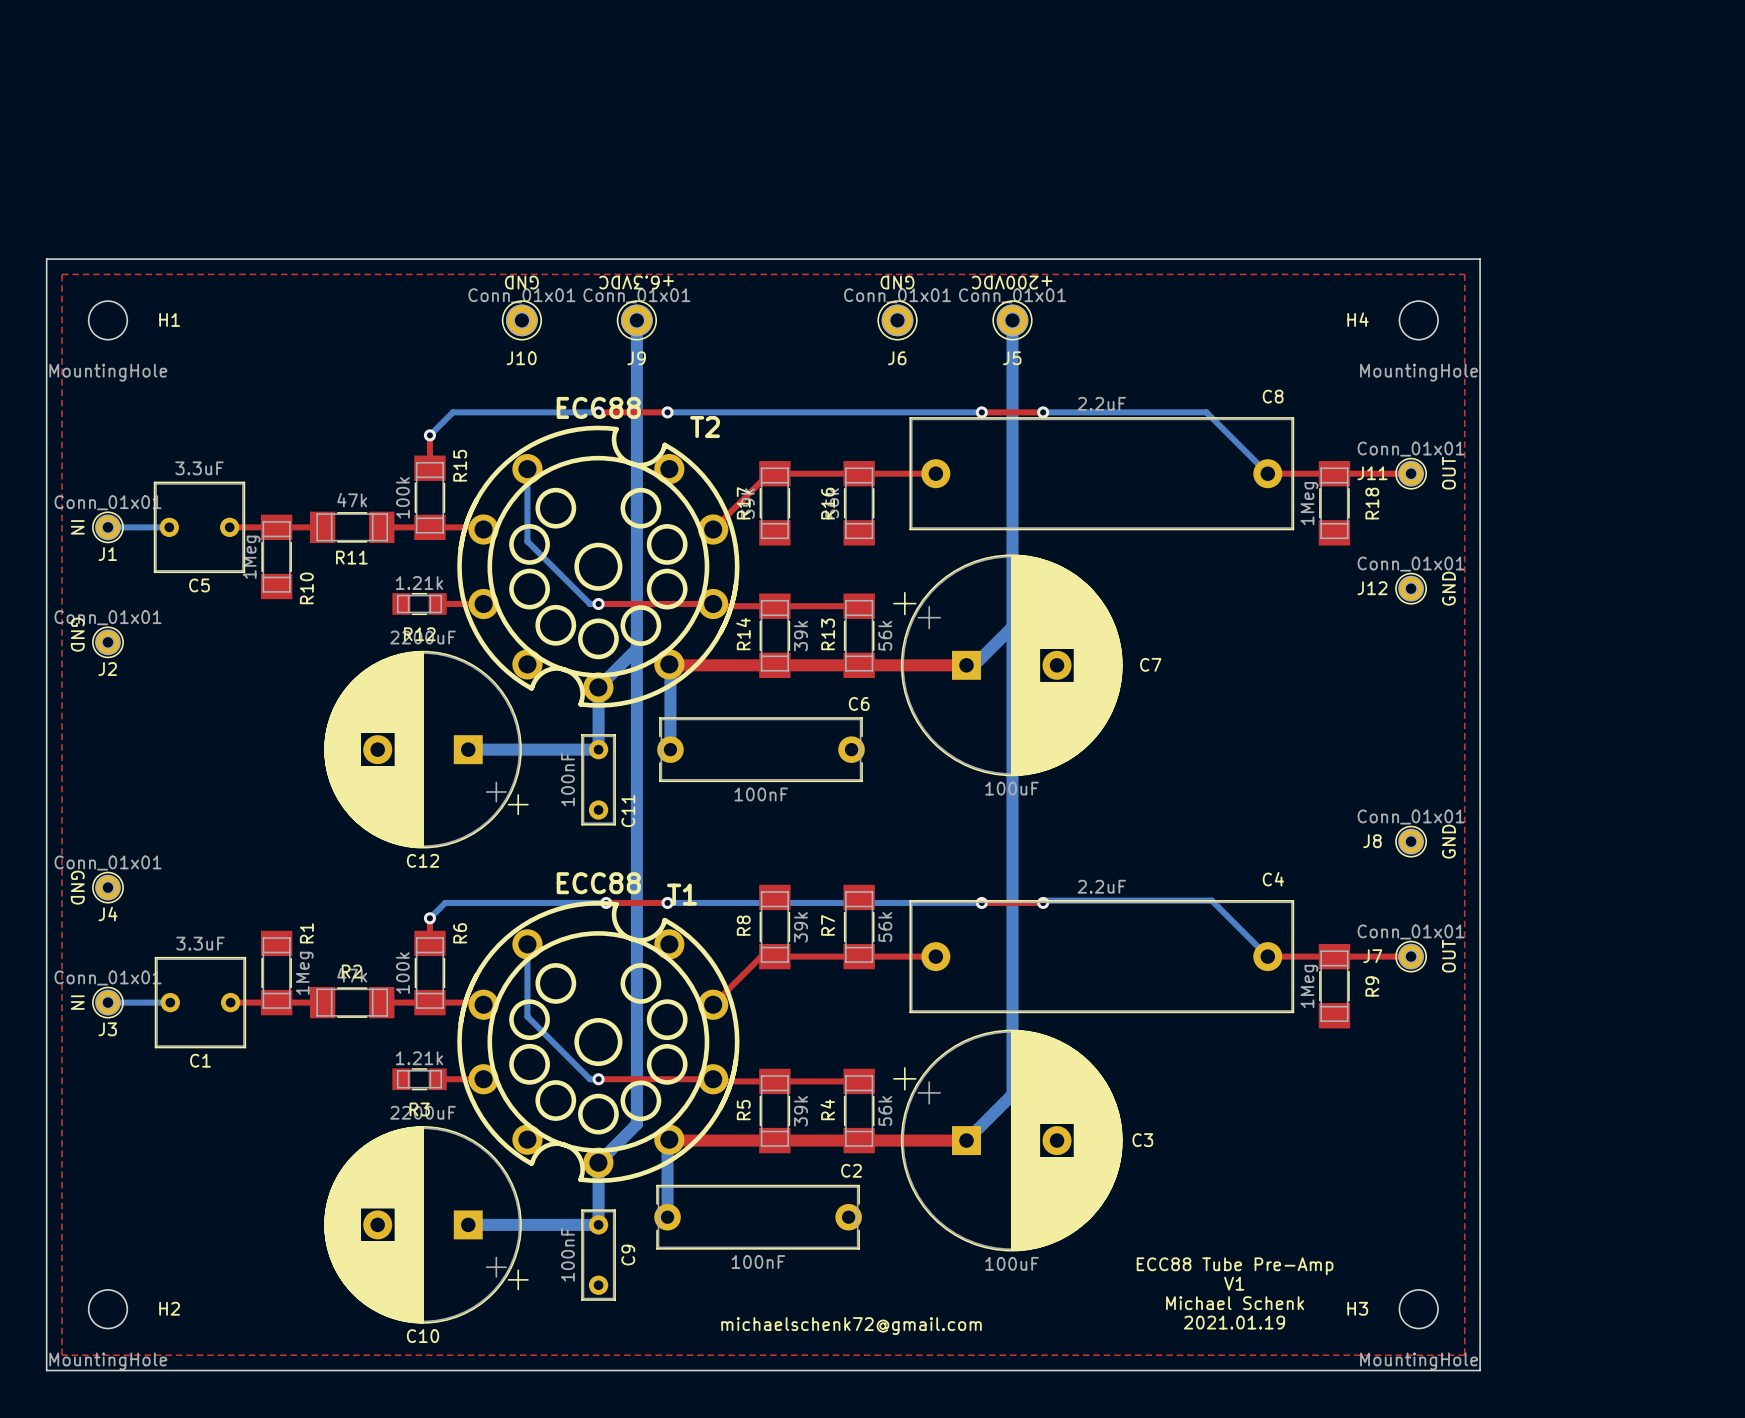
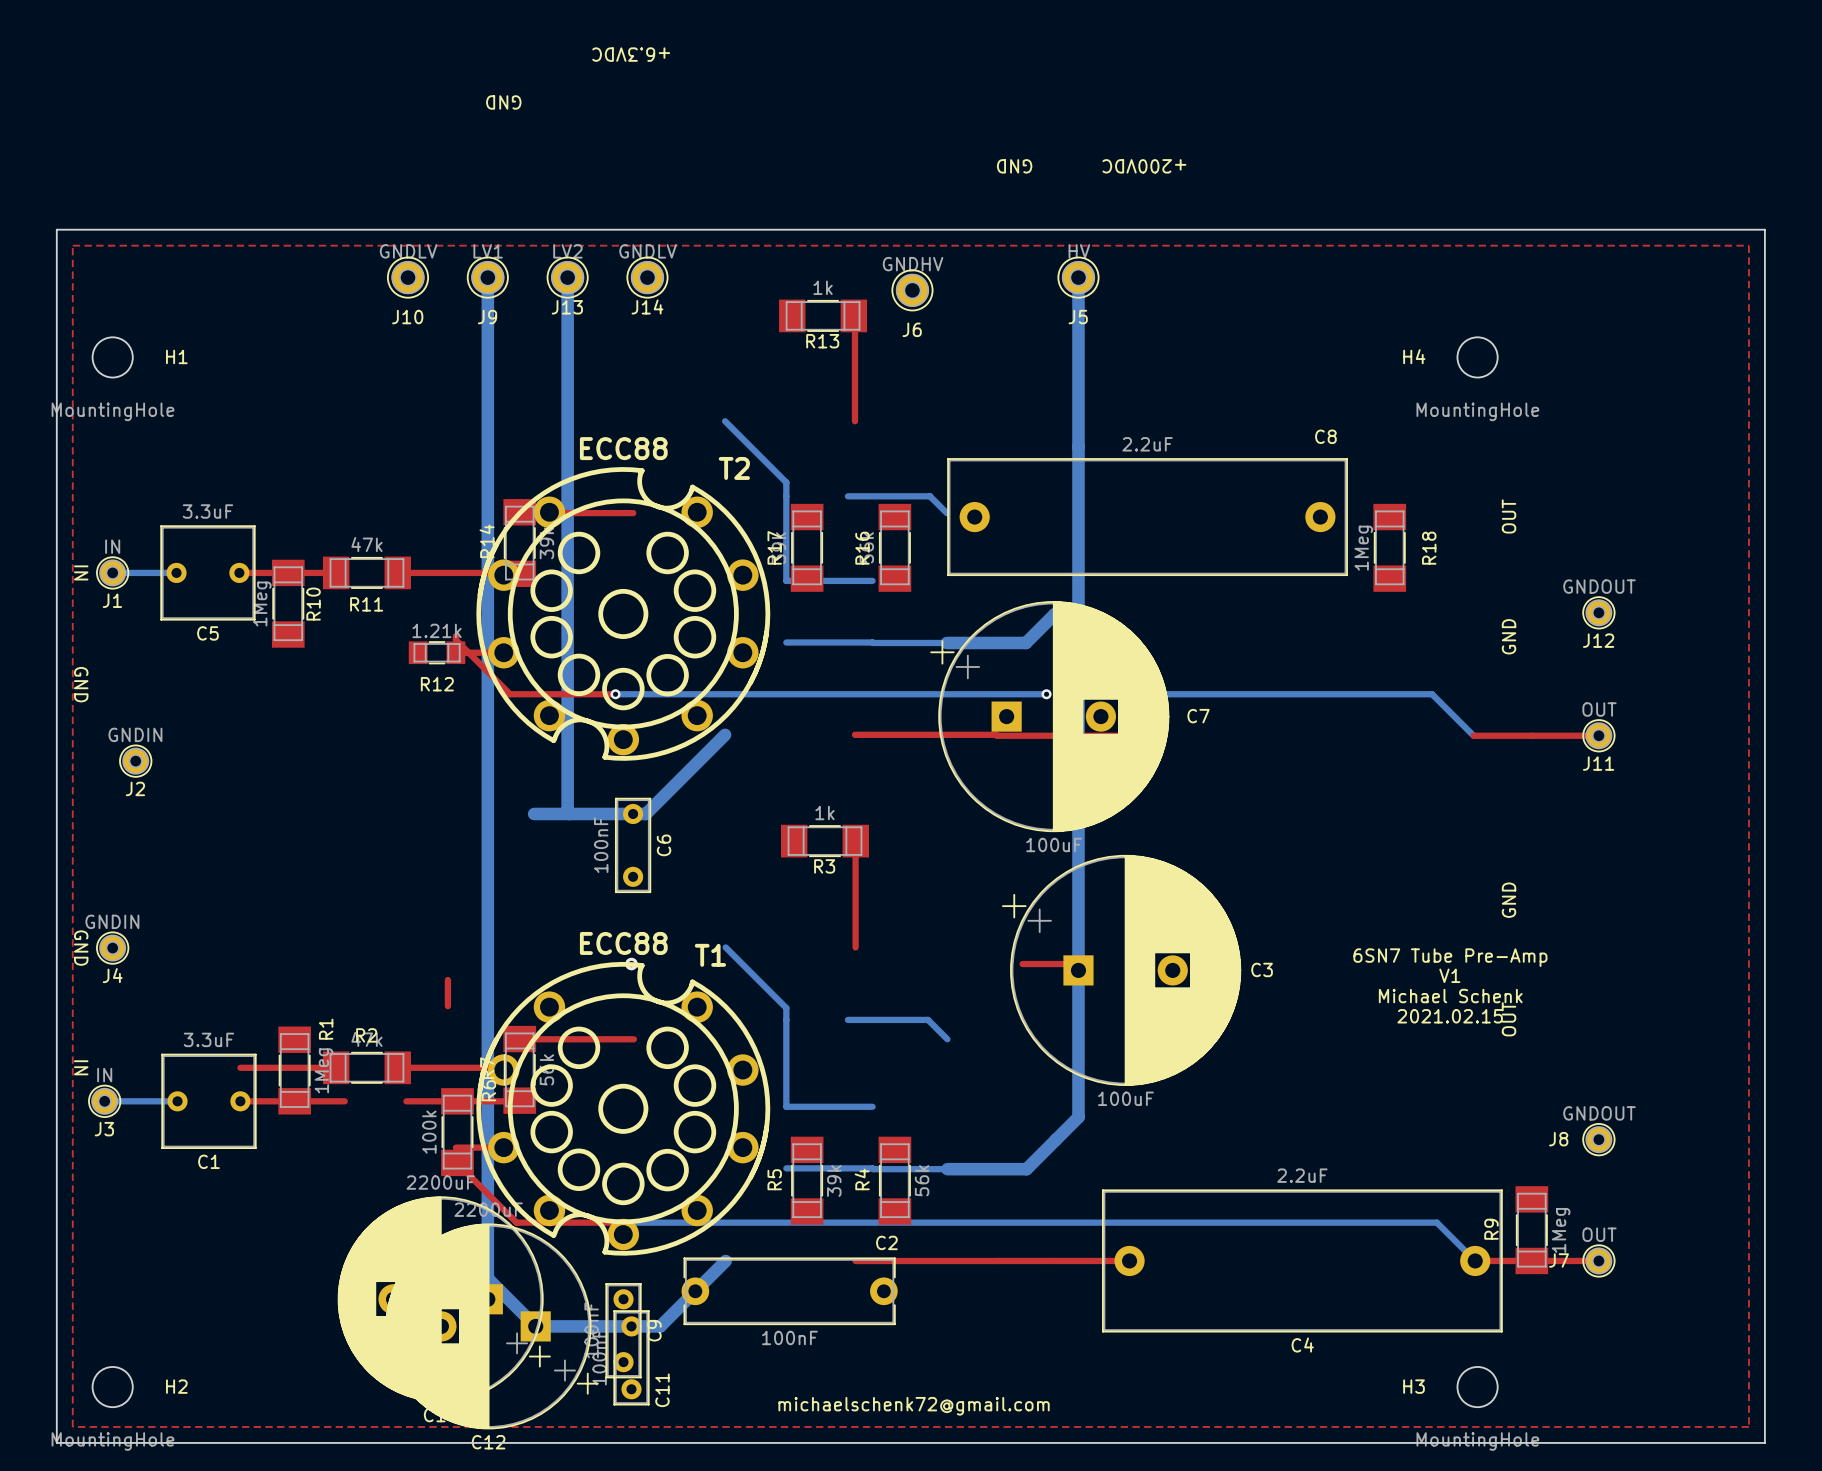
bottom track: none -> (487, 277) (487, 1278) (535, 1326) (660, 1326) (725, 1261)
bottom track: none -> (567, 277) (567, 812) (569, 813)
J13: none -> LV2 (567, 277)
J14: none -> GNDLV (647, 277)
bottom track: none -> (1078, 277) (1078, 1117) (1026, 1169) (786, 1168)
board edge: (46, 259) (1480, 259) (1480, 1370) (46, 1370) (46, 259) -> (56, 229) (56, 1442) (1764, 1442) (1764, 229) (56, 229)
top zone outline: (62, 274) (62, 1355) (1464, 1355) (1464, 274) (62, 274) -> (72, 245) (72, 1426) (1748, 1426) (1748, 245) (72, 245)
top track: none -> (853, 315) (854, 421)
text position: GND (521, 282) -> GND (503, 102)
text position: +6.3VDC (636, 282) -> +6.3VDC (631, 54)
text position: GND (897, 282) -> GND (1014, 166)
text position: +200VDC (1012, 282) -> +200VDC (1144, 166)
J10 value: Conn_01x01 (521, 295) -> GNDLV (408, 251)
J9 value: Conn_01x01 (636, 295) -> LV1 (488, 251)
J6 value: Conn_01x01 (897, 295) -> GNDHV (913, 264)
J5 value: Conn_01x01 (1012, 295) -> HV (1079, 251)
J10 position: (521, 320) -> (408, 277)
bottom track: (636, 320) (636, 1124) (598, 1162) (598, 1224) (468, 1224) -> none
J9 position: (636, 320) -> (487, 277)
J6 position: (897, 320) -> (912, 290)
bottom track: (1012, 320) (1012, 1094) (966, 1140) -> none
J5 position: (1012, 320) -> (1078, 277)
bottom track: none -> (725, 421) (786, 482) (786, 580) (872, 580)
bottom track: (598, 412) (452, 412) (429, 435) -> none
top track: (598, 412) (667, 412) -> none
via: (598, 412) -> none
bottom track: (667, 412) (981, 412) -> none
via: (667, 412) -> none
top track: (981, 412) (1043, 412) -> none
via: (981, 412) -> none
bottom track: (1043, 412) (1206, 412) (1267, 473) -> none
via: (1043, 412) -> none
top track: (429, 435) (429, 468) -> none
via: (429, 435) -> none
J11 value: Conn_01x01 (1411, 449) -> OUT (1599, 709)
bottom track: none -> (847, 496) (930, 496) (946, 513)
top track: none -> (519, 512) (633, 513)
bottom track: (527, 469) (527, 541) (590, 604) (598, 604) -> none
top track: (935, 473) (768, 473) (713, 529) -> none
top track: (1267, 473) (1411, 473) -> none
J11 name position: J11 (1372, 473) -> J11 (1598, 763)
J11 position: (1411, 473) -> (1598, 735)
R15: 100k (429, 497) -> none
J1 value: Conn_01x01 (107, 502) -> IN (112, 546)
J12 value: Conn_01x01 (1411, 564) -> GNDOUT (1599, 586)
bottom track: none -> (1078, 614) (1054, 614) (1025, 642) (786, 642)
R10 name position: R10 (306, 588) -> R10 (313, 604)
top track: none -> (455, 636) (455, 639) (510, 694) (615, 694)
J12 name position: J12 (1372, 588) -> J12 (1598, 640)
J12 position: (1411, 588) -> (1598, 612)
top track: (598, 604) (859, 606) -> none
via: (598, 604) -> none
J2 value: Conn_01x01 (107, 617) -> GNDIN (135, 734)
bottom track: (1012, 627) (974, 665) (966, 665) -> none
R13 name position: R13 (828, 634) -> R13 (822, 341)
R14 position: (774, 635) -> (519, 543)
R13 rotation: 0° (859, 635) -> 90° clockwise (823, 315)
R13 position: (859, 635) -> (823, 315)
R13 value: 56k (885, 635) -> 1k (823, 287)
J2 position: (107, 642) -> (135, 761)
bottom track: none -> (615, 694) (1046, 694)
via: none -> (615, 694)
via: none -> (1046, 694)
bottom track: none -> (1112, 694) (1432, 694) (1473, 735)
bottom track: (636, 648) (598, 687) (598, 749) (468, 749) -> none
bottom track: (669, 664) (670, 749) -> none
top track: (669, 664) (966, 665) -> none
bottom track: none -> (725, 734) (645, 813) (534, 813)
top track: none -> (854, 734) (1127, 735)
top track: none -> (1473, 735) (1598, 735)
C6 name position: C6 (859, 703) -> C6 (664, 845)
C6 footprint: [657, 717, 865, 783] -> [615, 797, 652, 893]
C12 position: (426, 749) -> (492, 1326)
C11 position: (598, 779) -> (631, 1357)
top track: none -> (855, 841) (855, 947)
C6 value position: 100nF (761, 794) -> 100nF (601, 845)
J8 value: Conn_01x01 (1411, 817) -> GNDOUT (1599, 1113)
J8 position: (1411, 841) -> (1598, 1139)
J4 value: Conn_01x01 (107, 863) -> GNDIN (112, 921)
C4 name position: C4 (1273, 879) -> C4 (1302, 1345)
bottom track: none -> (725, 947) (786, 1008) (786, 1106) (872, 1106)
text: none -> 6SN7 Tube Pre-Amp (1450, 957)
C4 footprint: [909, 900, 1295, 1014] -> [1102, 1189, 1503, 1333]
bottom track: (606, 902) (445, 902) (429, 918) -> none
top track: (606, 902) (667, 902) -> none
bottom track: (667, 902) (981, 902) -> none
via: (667, 902) -> none
via: (981, 902) -> none
bottom track: (1043, 902) (1045, 900) (1211, 900) (1267, 956) -> none
via: (1043, 902) -> none
text: none -> V1 (1449, 975)
via: (429, 918) -> none
R8: 39k (774, 927) -> none
R7 position: (859, 927) -> (519, 1069)
J7 value: Conn_01x01 (1411, 931) -> OUT (1599, 1234)
text: none -> Michael Schenk (1450, 996)
bottom track: (527, 944) (527, 1016) (590, 1079) (598, 1079) -> none
text: none -> 2021.02.15 (1450, 1016)
bottom track: none -> (847, 1019) (928, 1019) (947, 1039)
top track: (935, 956) (761, 956) (713, 1004) -> none
top track: (1267, 956) (1411, 956) -> none
J7 position: (1411, 956) -> (1598, 1260)
R1 position: (276, 973) -> (294, 1070)
R6 position: (429, 973) -> (457, 1132)
top track: none -> (519, 1039) (633, 1039)
J3 value: Conn_01x01 (107, 977) -> IN (104, 1075)
R9 value position: 1Meg (1309, 986) -> 1Meg (1561, 1230)
R9 position: (1334, 986) -> (1531, 1230)
R9 name position: R9 (1372, 986) -> R9 (1491, 1229)
bottom track: (107, 1002) (170, 1002) -> none
J3 position: (107, 1002) -> (104, 1101)
C1 position: (200, 1002) -> (208, 1101)
bottom track: none -> (104, 1101) (177, 1101)
top track: none -> (240, 1101) (344, 1101)
top track: none -> (519, 1100) (406, 1101)
R3 value: 1.21k (419, 1058) -> 1k (824, 812)
R3 footprint: [392, 1068, 447, 1091] -> [781, 824, 869, 858]
top track: (598, 1079) (859, 1081) -> none
via: (598, 1079) -> none
top track: none -> (457, 1162) (516, 1222) (617, 1222)
bottom track: (669, 1139) (667, 1141) (667, 1217) -> none
top track: (669, 1139) (966, 1140) -> none
C3 position: (1007, 1140) -> (1121, 970)
bottom track: none -> (617, 1222) (1436, 1222) (1475, 1260)
top track: none -> (855, 1261) (998, 1261)
top track: none -> (998, 1260) (1129, 1260)
top track: none -> (1475, 1260) (1598, 1260)
text: ECC88 Tube Pre-Amp (1235, 1266) -> none
text: V1 (1234, 1283) -> none
text: Michael Schenk (1235, 1303) -> none
text: 2021.01.19 (1234, 1322) -> none
text position: michaelschenk72@gmail.com (851, 1326) -> michaelschenk72@gmail.com (914, 1406)

